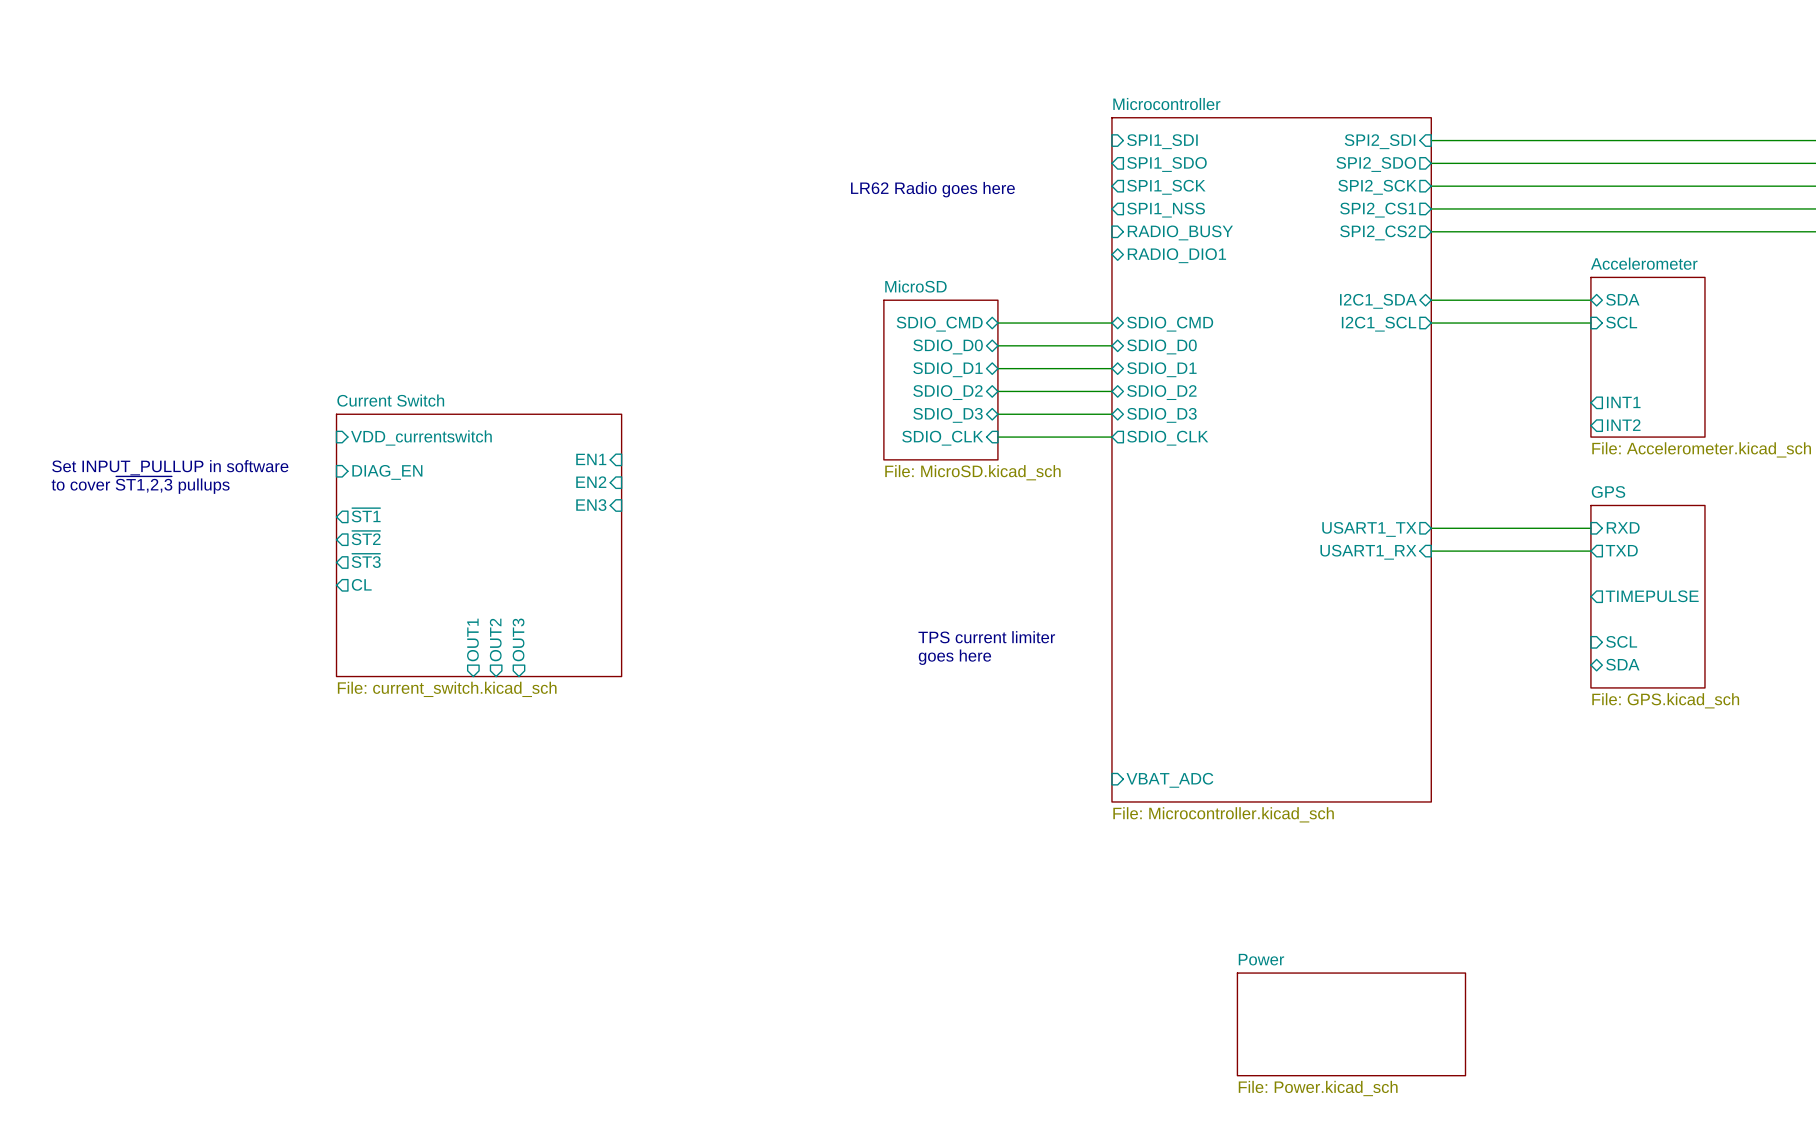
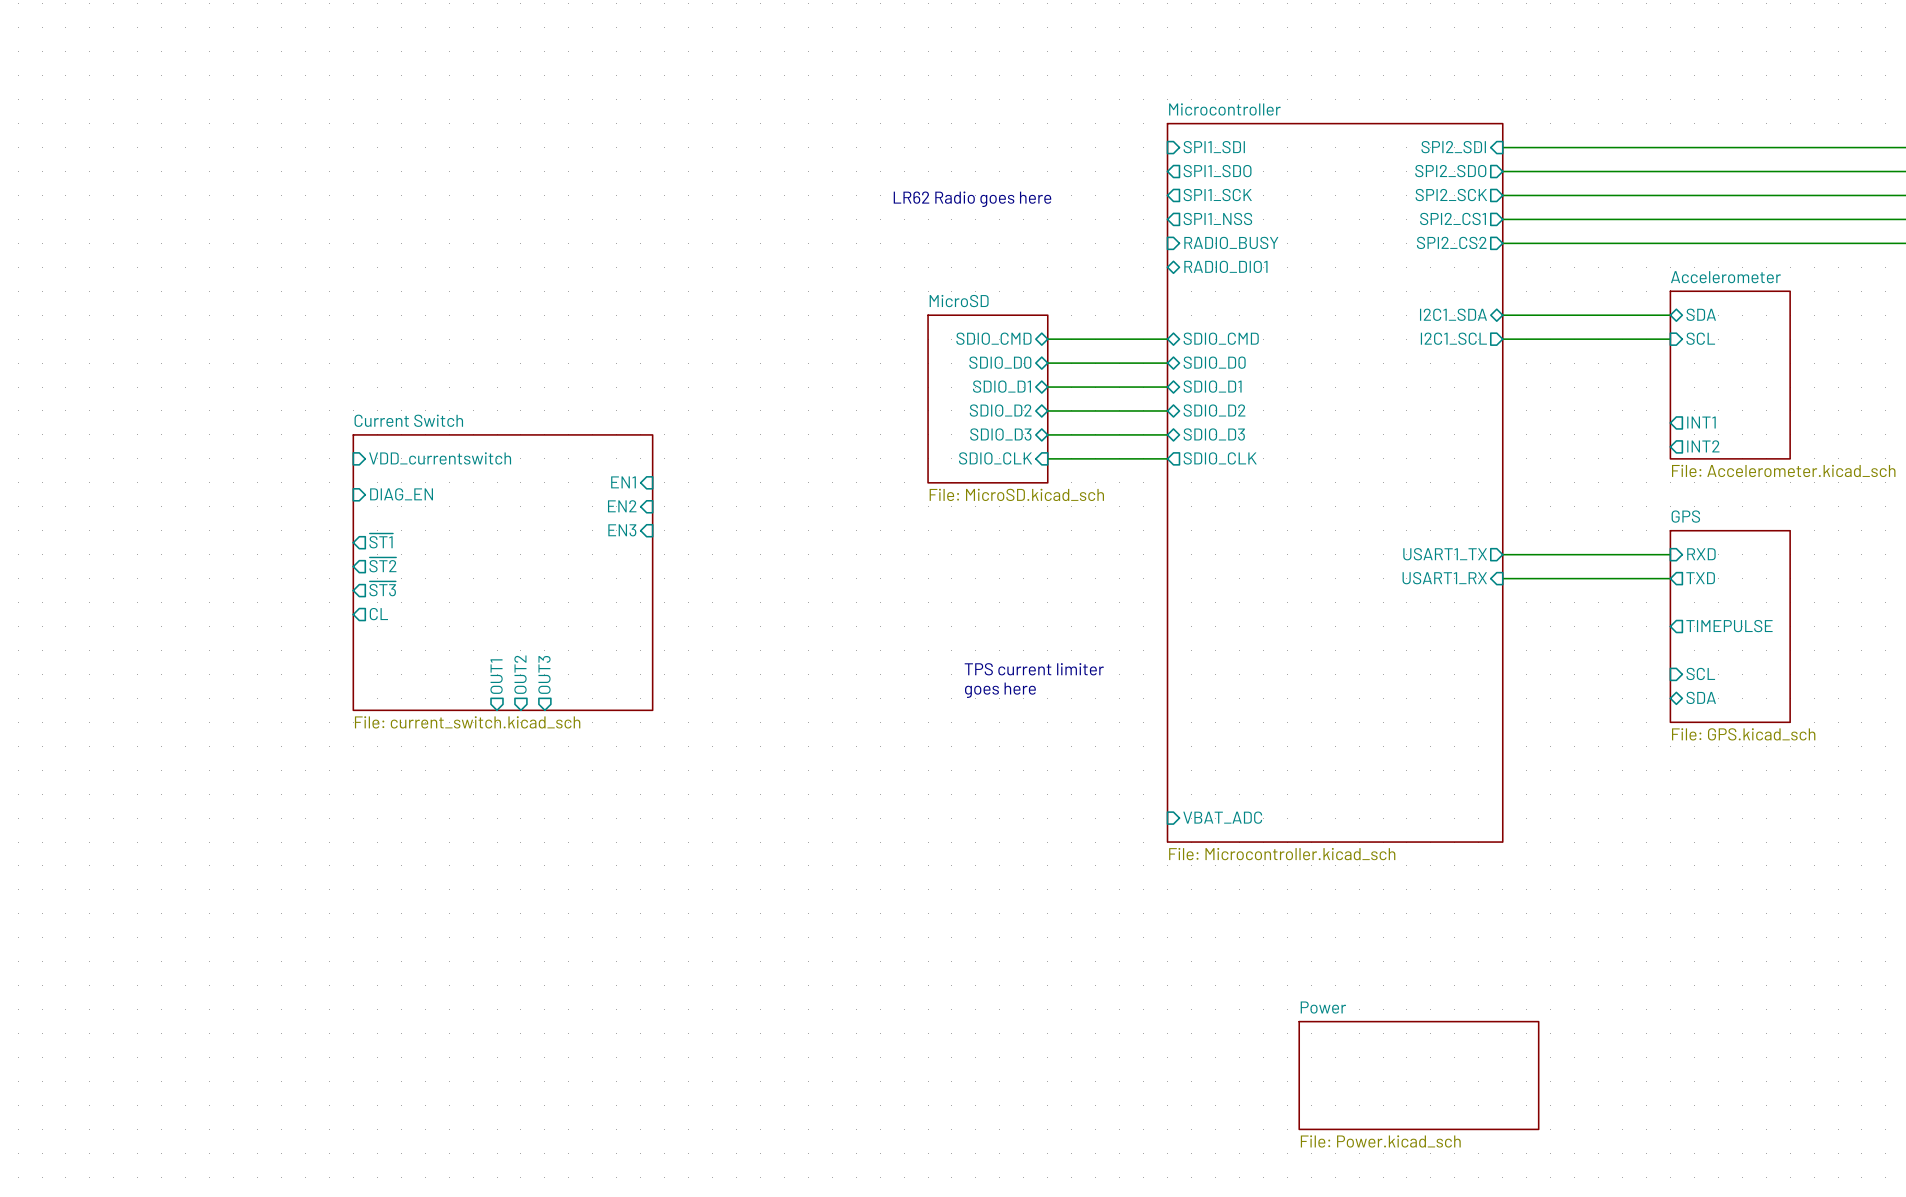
text: Set INPUT_PULLUP in software (170, 467) -> none
text: to cover ~{ST1,2,3} pullups (140, 485) -> none

